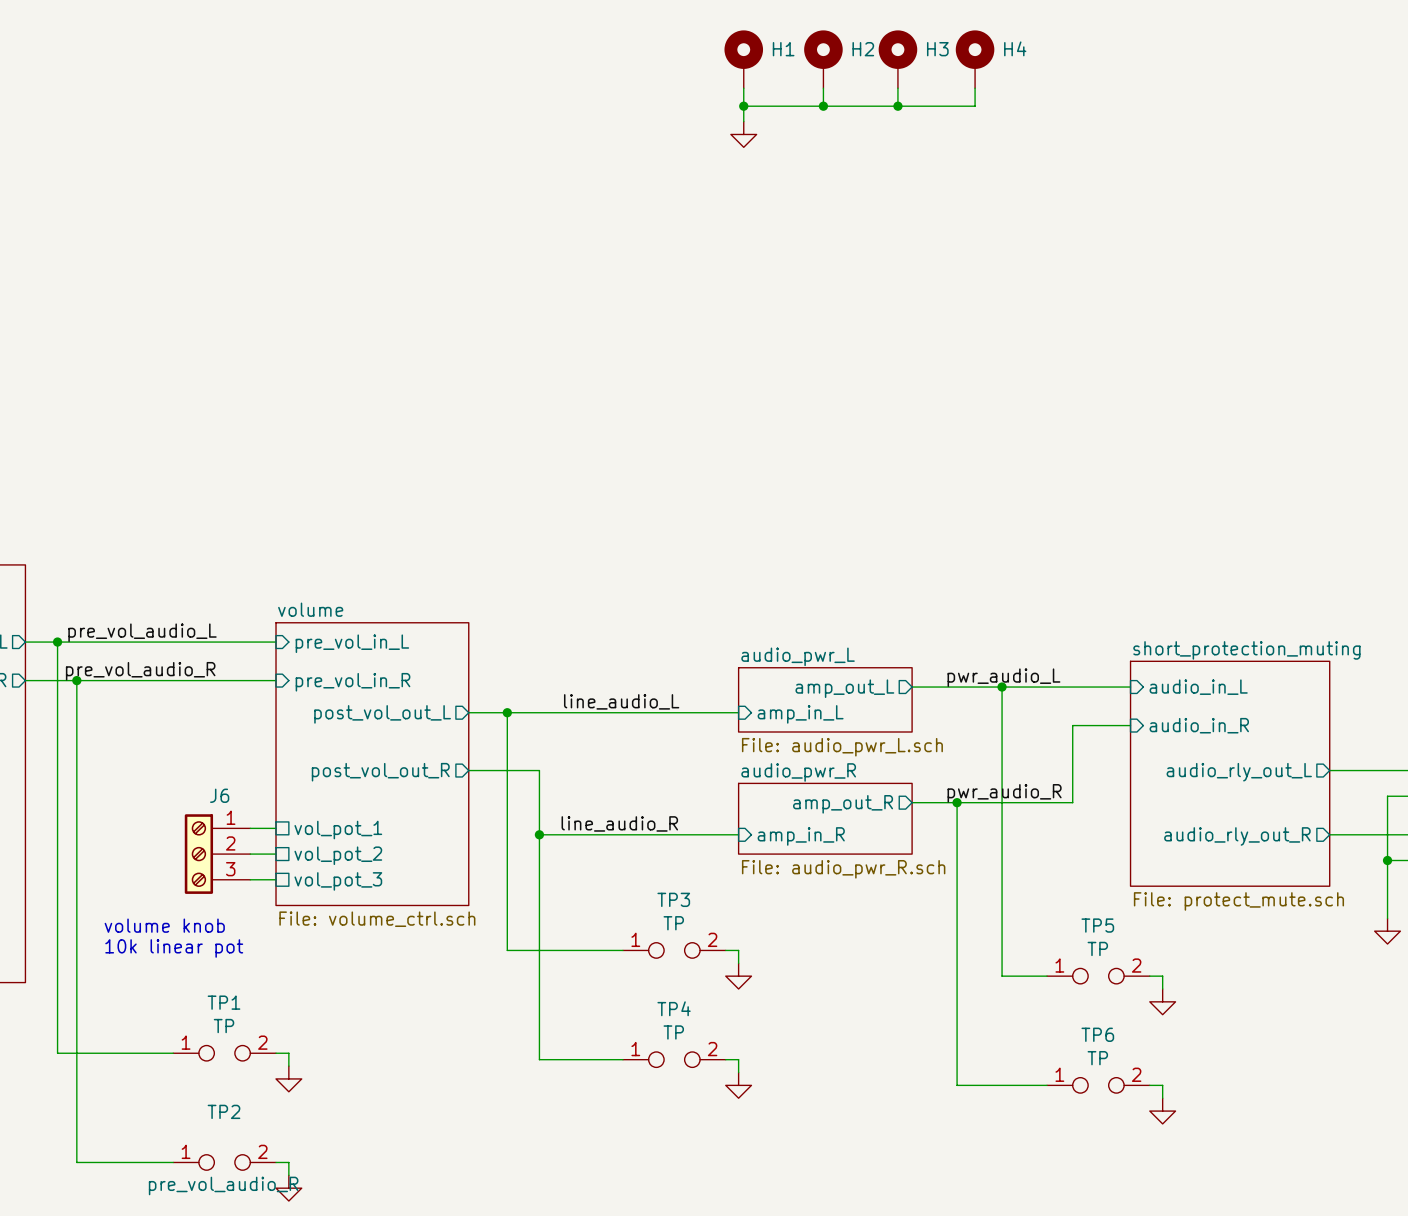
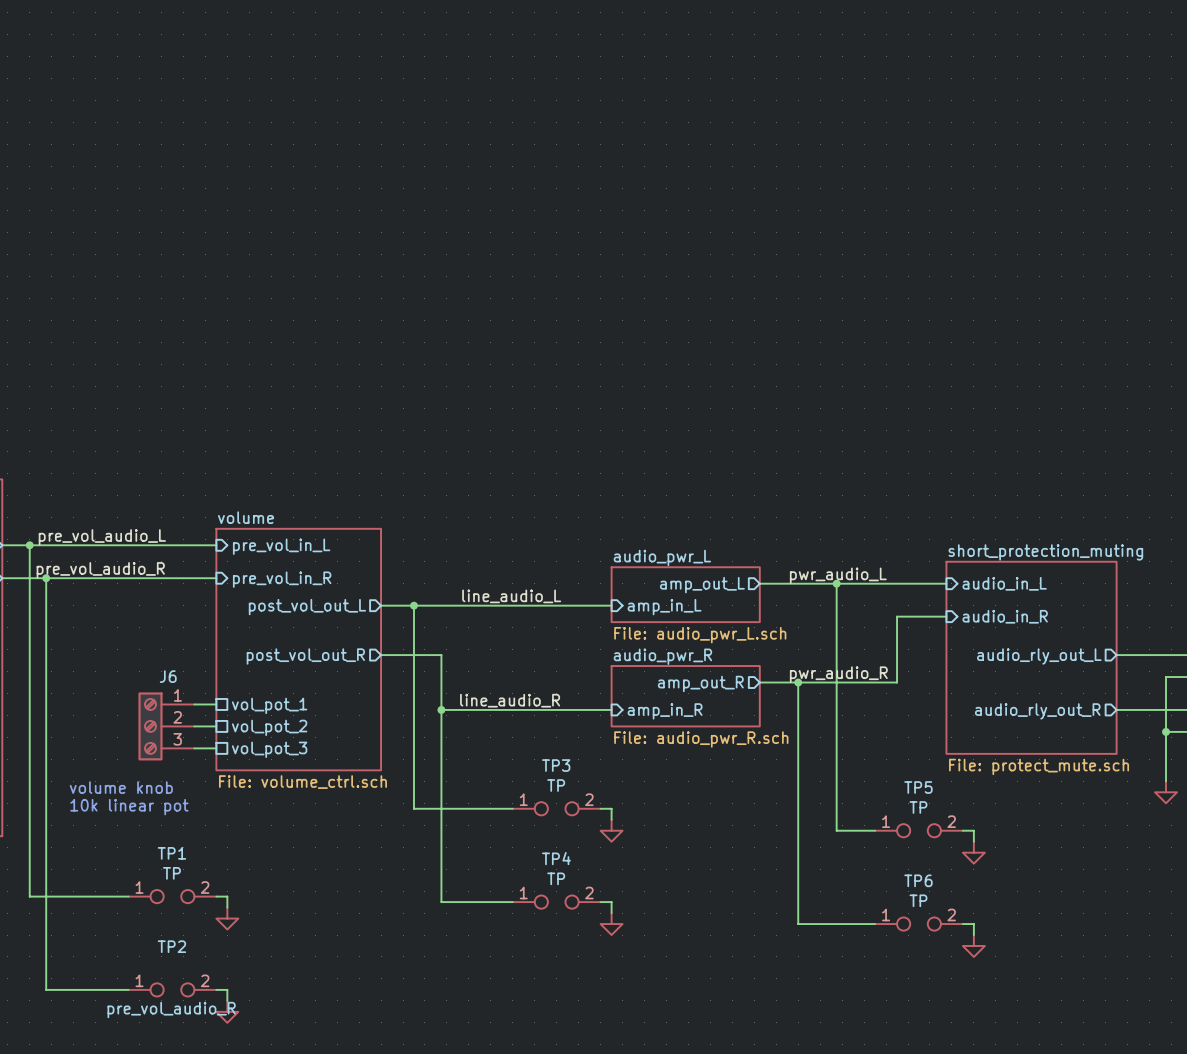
H1: (743, 59) -> none
H2: (823, 59) -> none
H3: (897, 59) -> none
H4: (975, 59) -> none
wire: (743, 88) (743, 121) -> none
wire: (823, 88) (823, 106) -> none
wire: (897, 88) (897, 106) -> none
wire: (975, 88) (975, 106) (743, 106) -> none
junction: (743, 106) -> none
junction: (823, 106) -> none
junction: (897, 106) -> none
power symbol: (743, 134) -> none

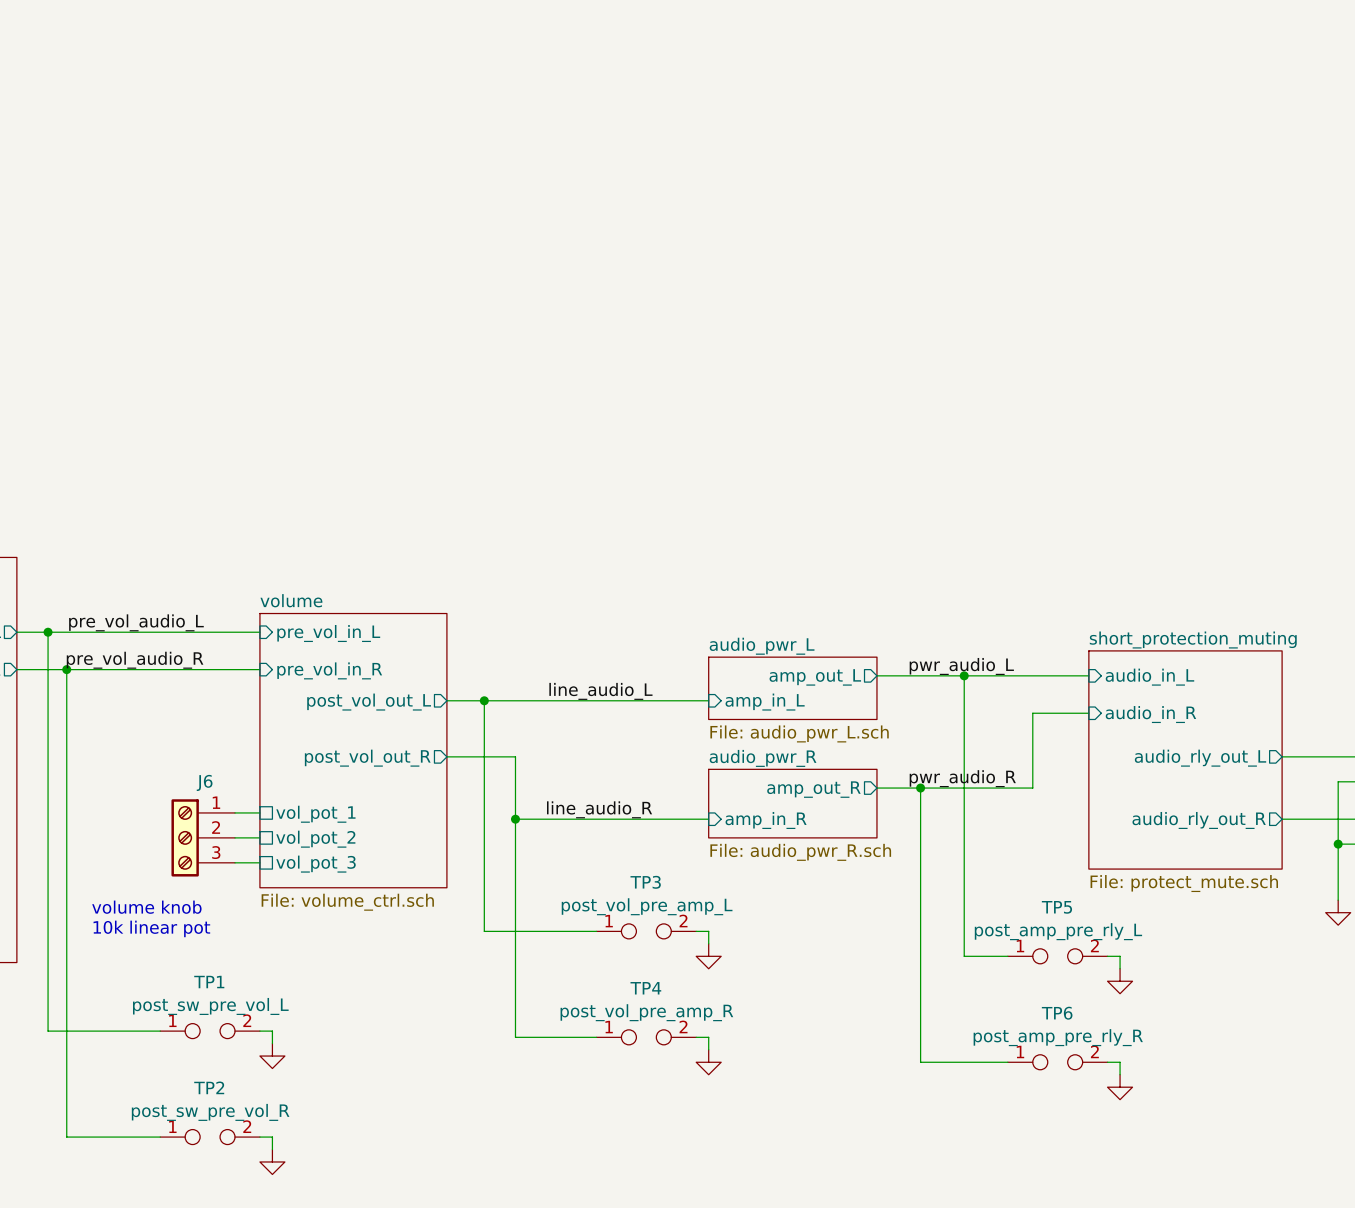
TP3 value: TP (556, 785) -> post_vol_pre_amp_L (647, 906)
TP5 value: TP (918, 807) -> post_amp_pre_rly_L (1058, 931)
TP1 value: TP (171, 873) -> post_sw_pre_vol_L (210, 1006)
TP4 value: TP (556, 878) -> post_vol_pre_amp_R (646, 1012)
TP6 value: TP (918, 900) -> post_amp_pre_rly_R (1058, 1037)
TP2 value: none -> post_sw_pre_vol_R (210, 1112)
TP2 text: pre_vol_audio_R (171, 1009) -> none

